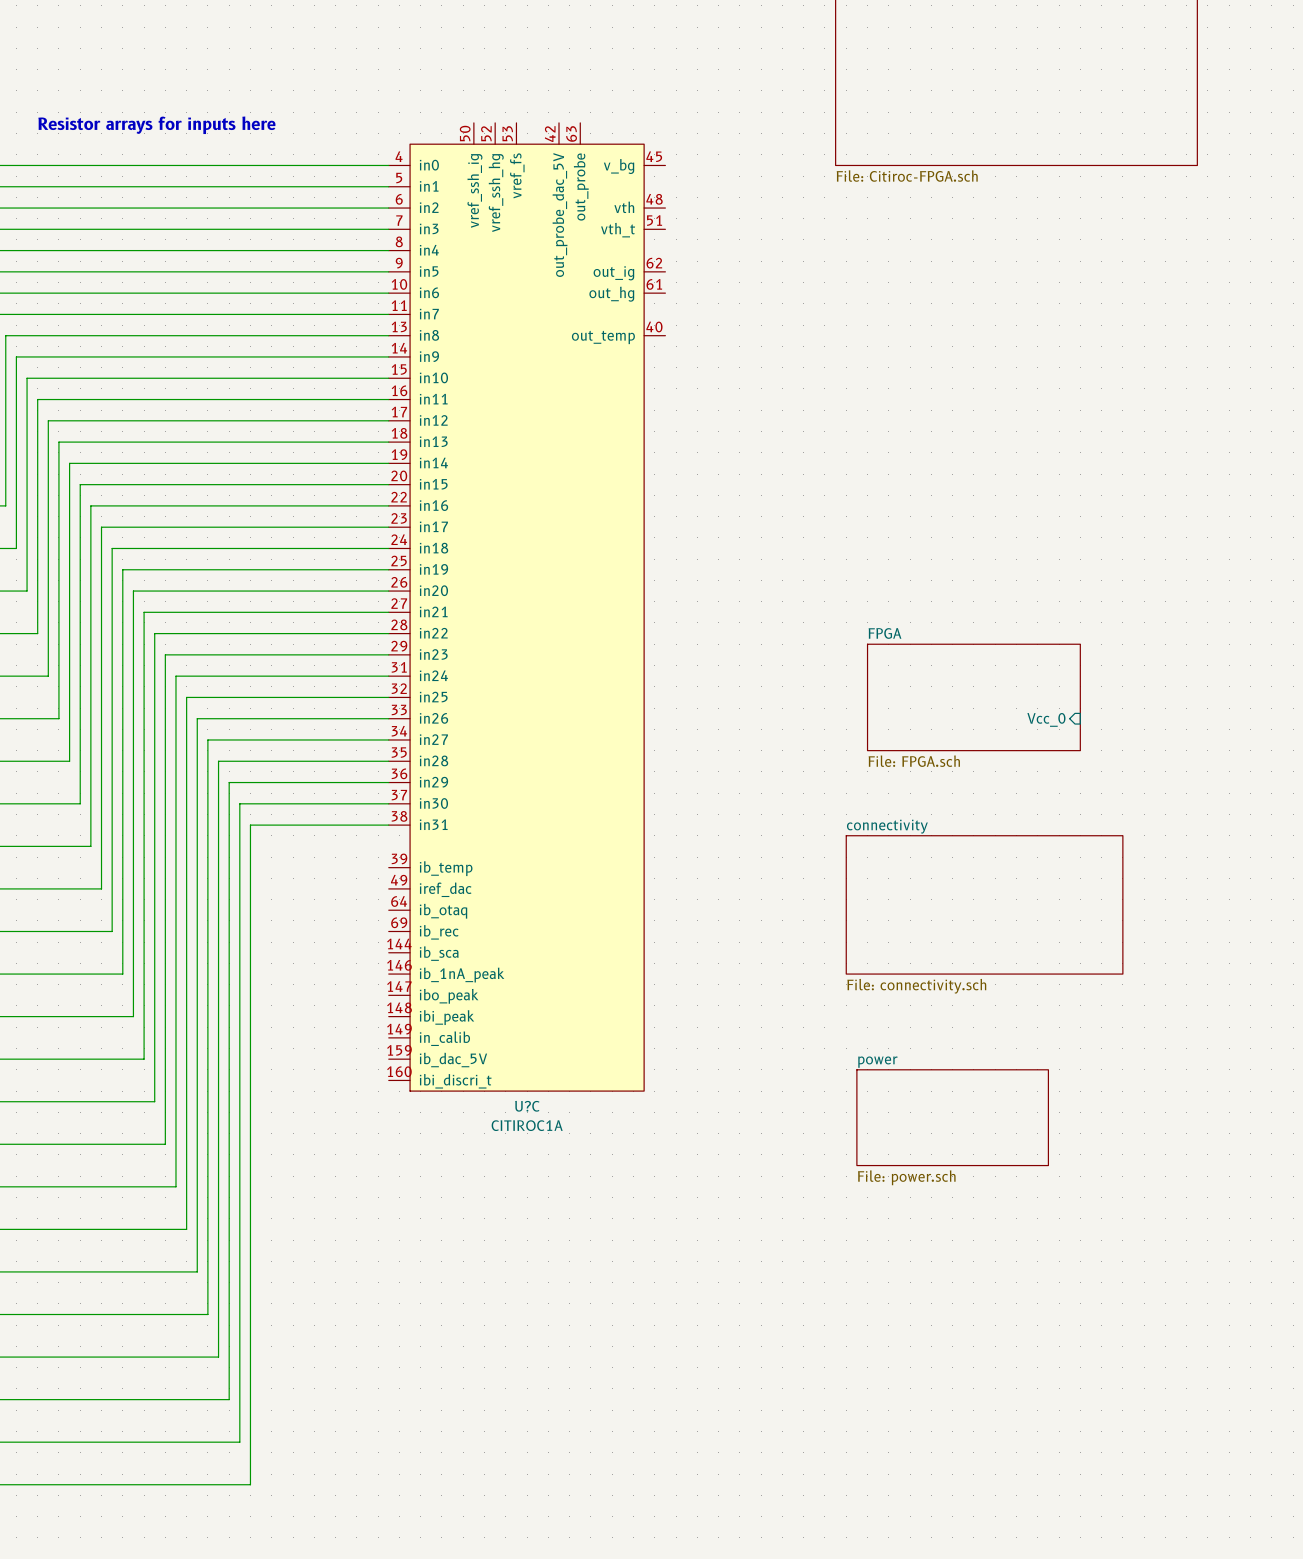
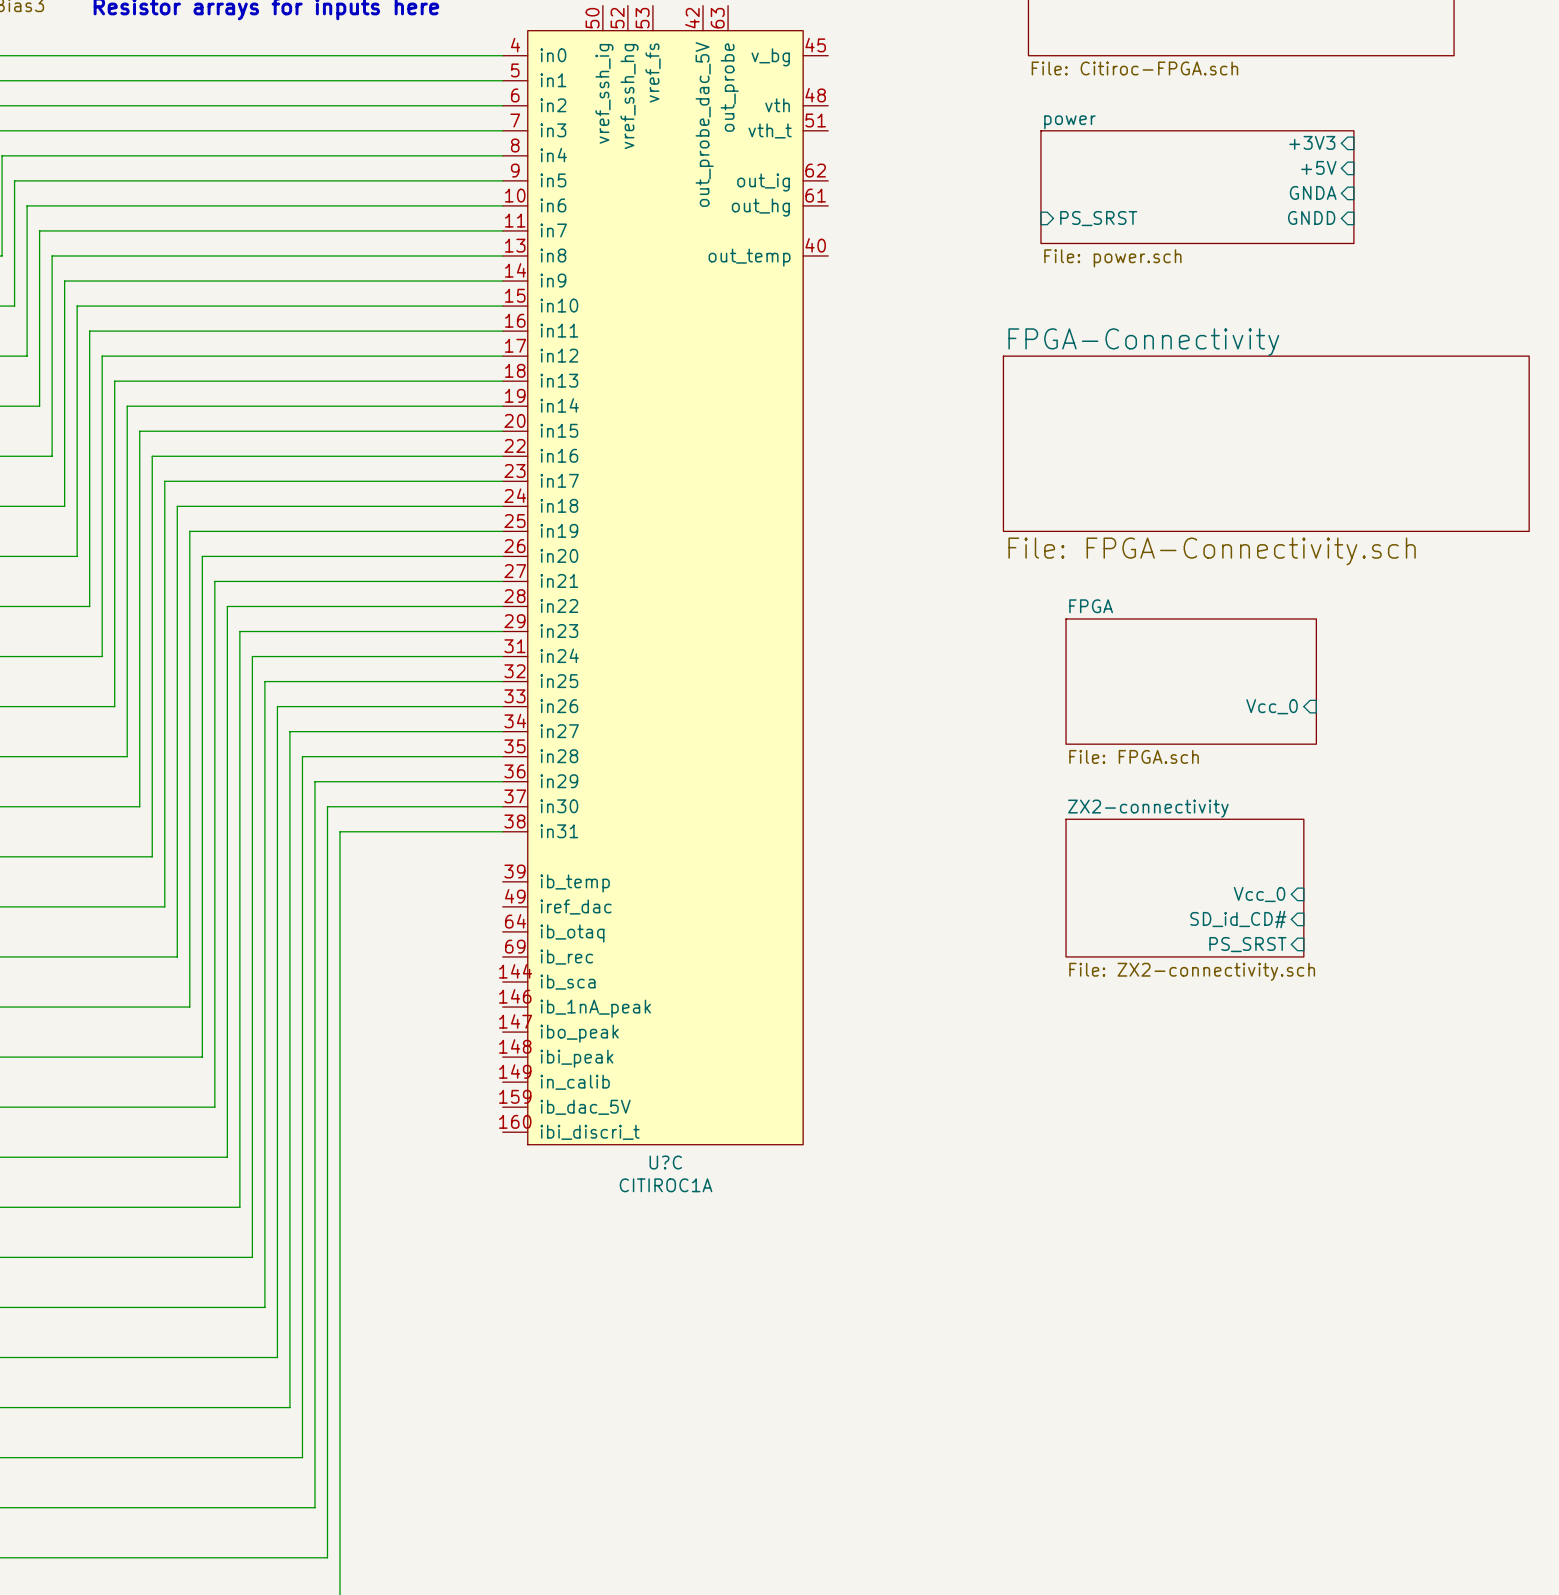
sheet pin: none -> +3V3 (1312, 142)
sheet pin: none -> +5V (1318, 167)
sheet power: none -> File: power.sch (1197, 187)
sheet pin: none -> GNDA (1313, 192)
sheet pin: none -> GNDD (1311, 217)
sheet pin: none -> PS_SRST (1098, 218)
sheet FPGA-Connectivity: none -> File: FPGA-Connectivity.sch (1266, 443)
sheet ZX2-connectivity: none -> File: ZX2-connectivity.sch (1184, 888)
sheet pin: none -> Vcc_0 (1259, 894)
sheet pin: none -> SD_id_CD# (1238, 919)
sheet connectivity: File: connectivity.sch (984, 904) -> none
sheet pin: none -> PS_SRST (1247, 944)
sheet power: File: power.sch (952, 1117) -> none

